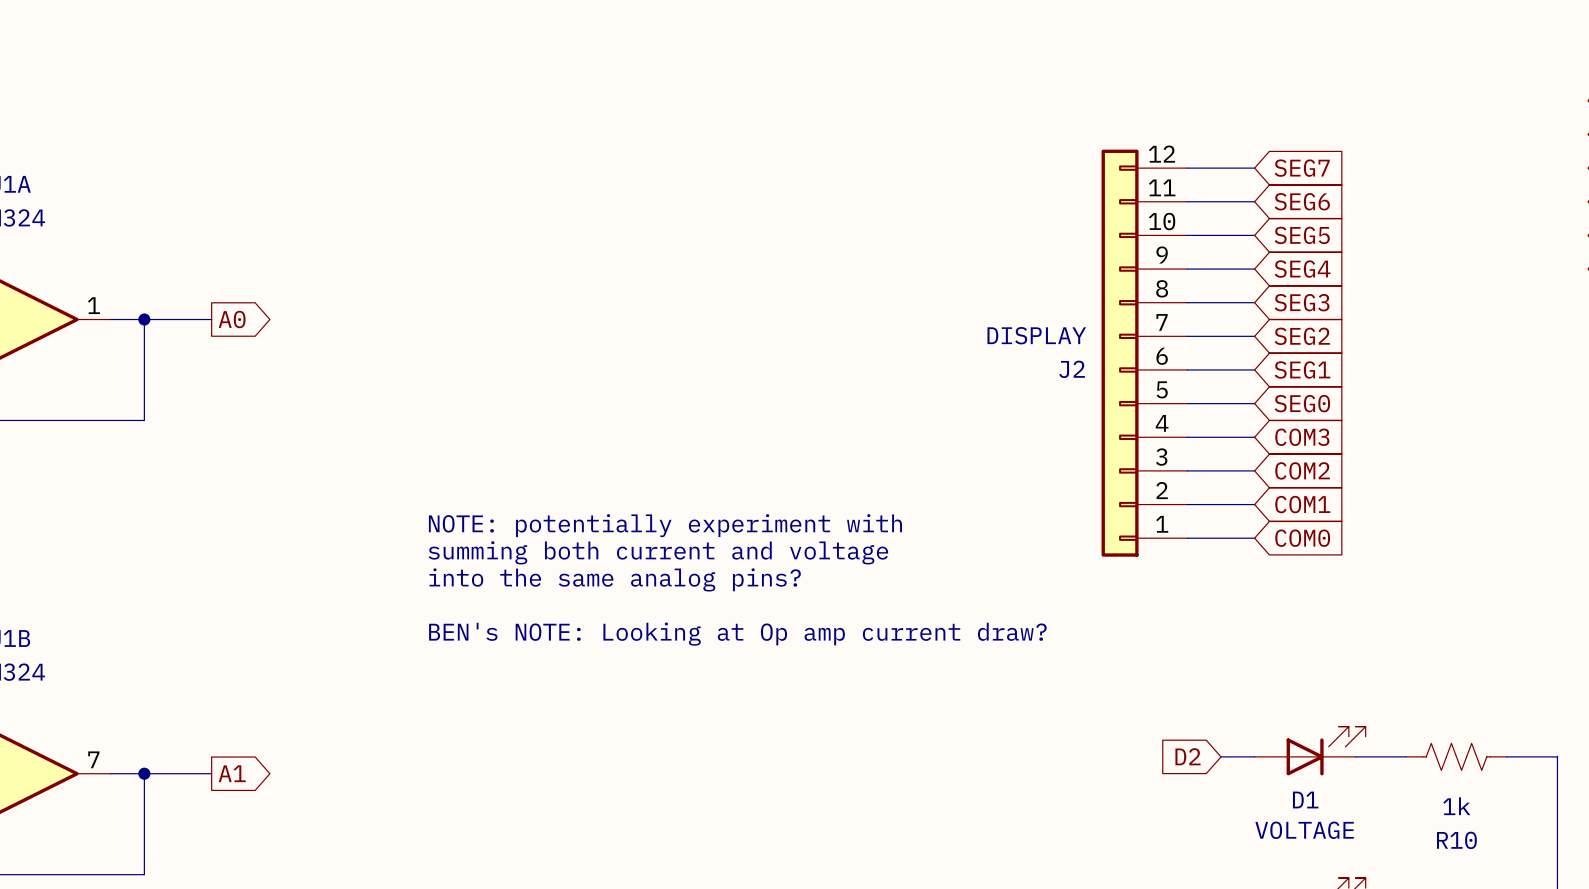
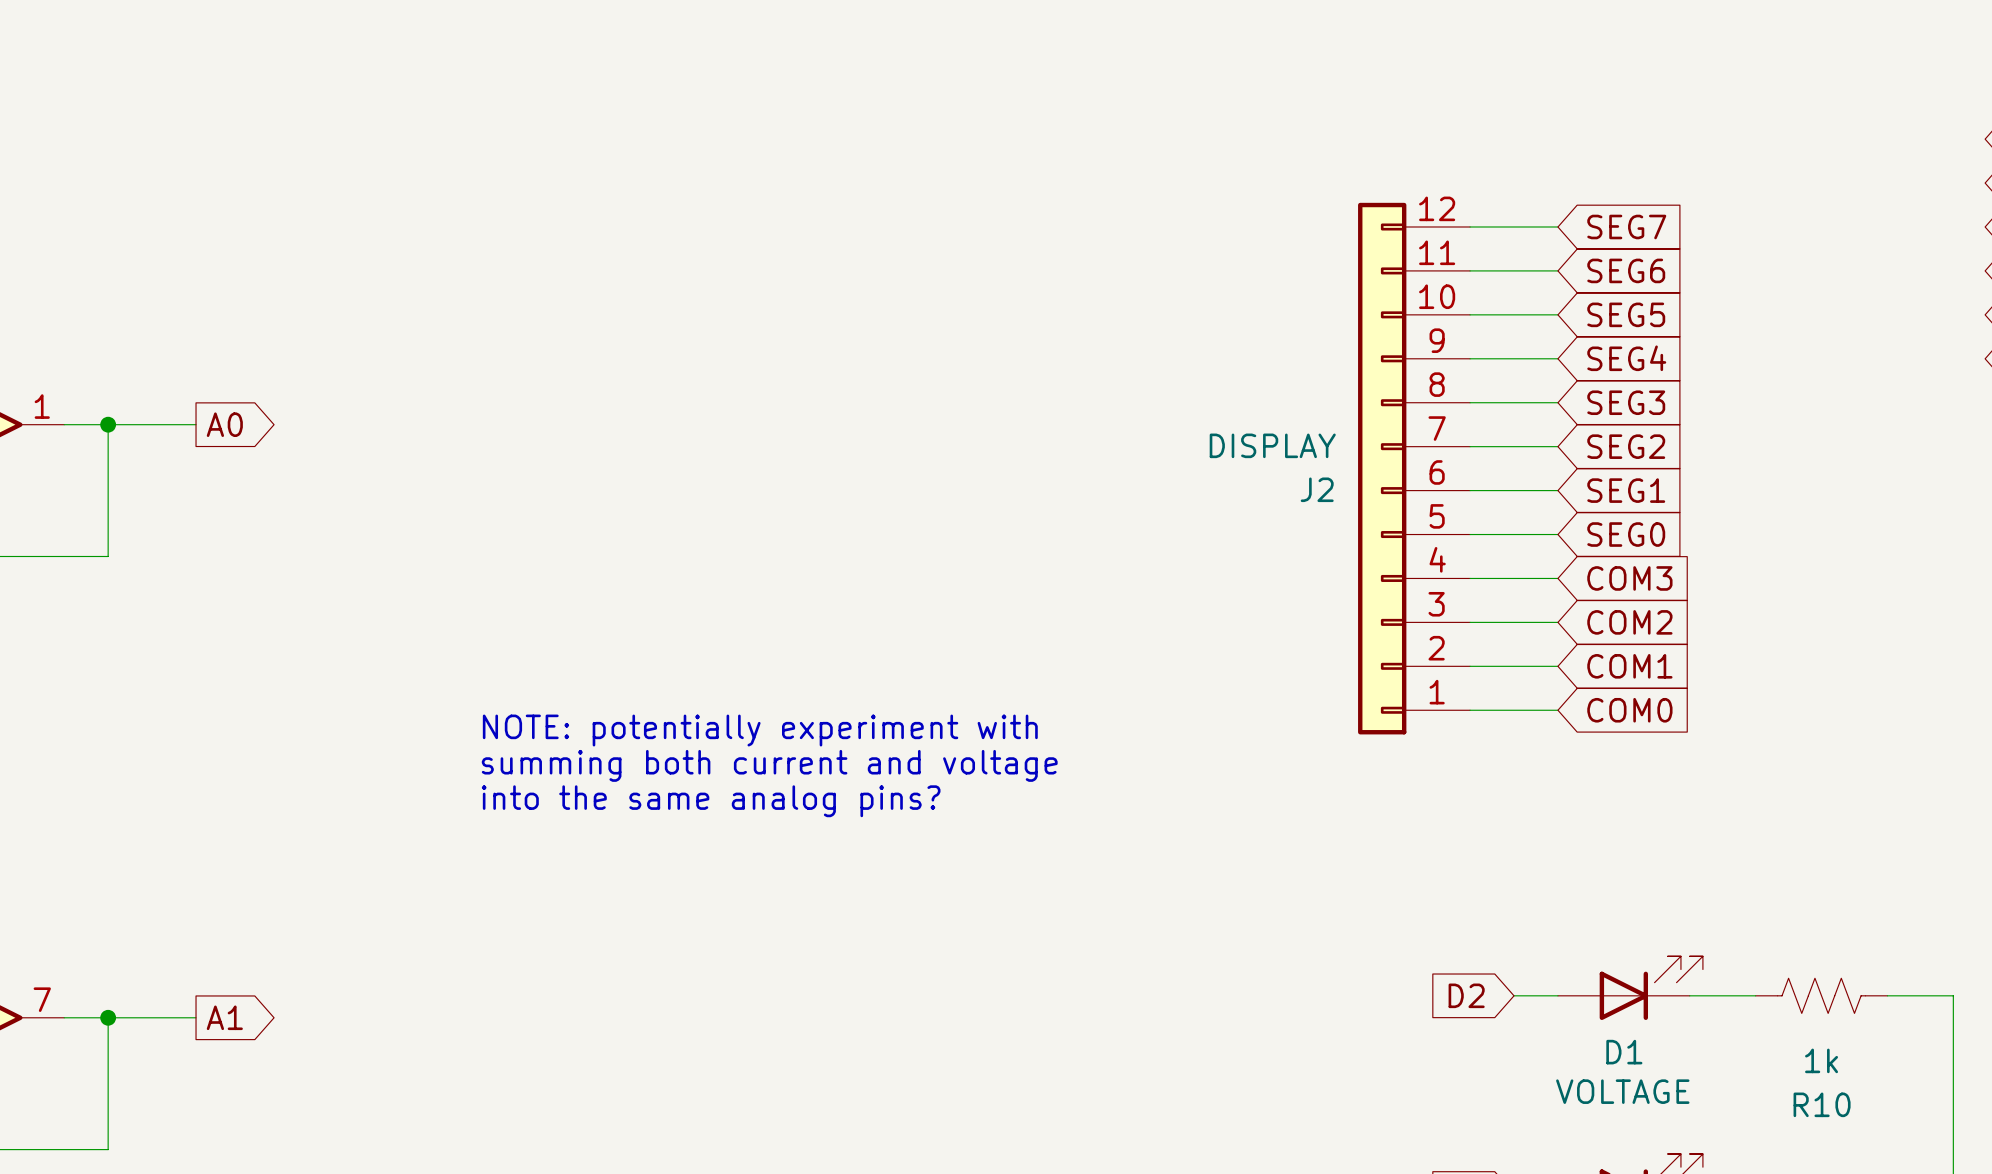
text: NOTE: potentially experiment with (665, 525) -> none
text: summing both current and voltage (658, 552) -> NOTE: potentially experiment with (760, 730)
text: into the same analog pins? (615, 579) -> summing both current and voltage (769, 765)
text: none -> into the same analog pins? (711, 801)
text: BEN's NOTE: Looking at Op amp current draw? (737, 634) -> none

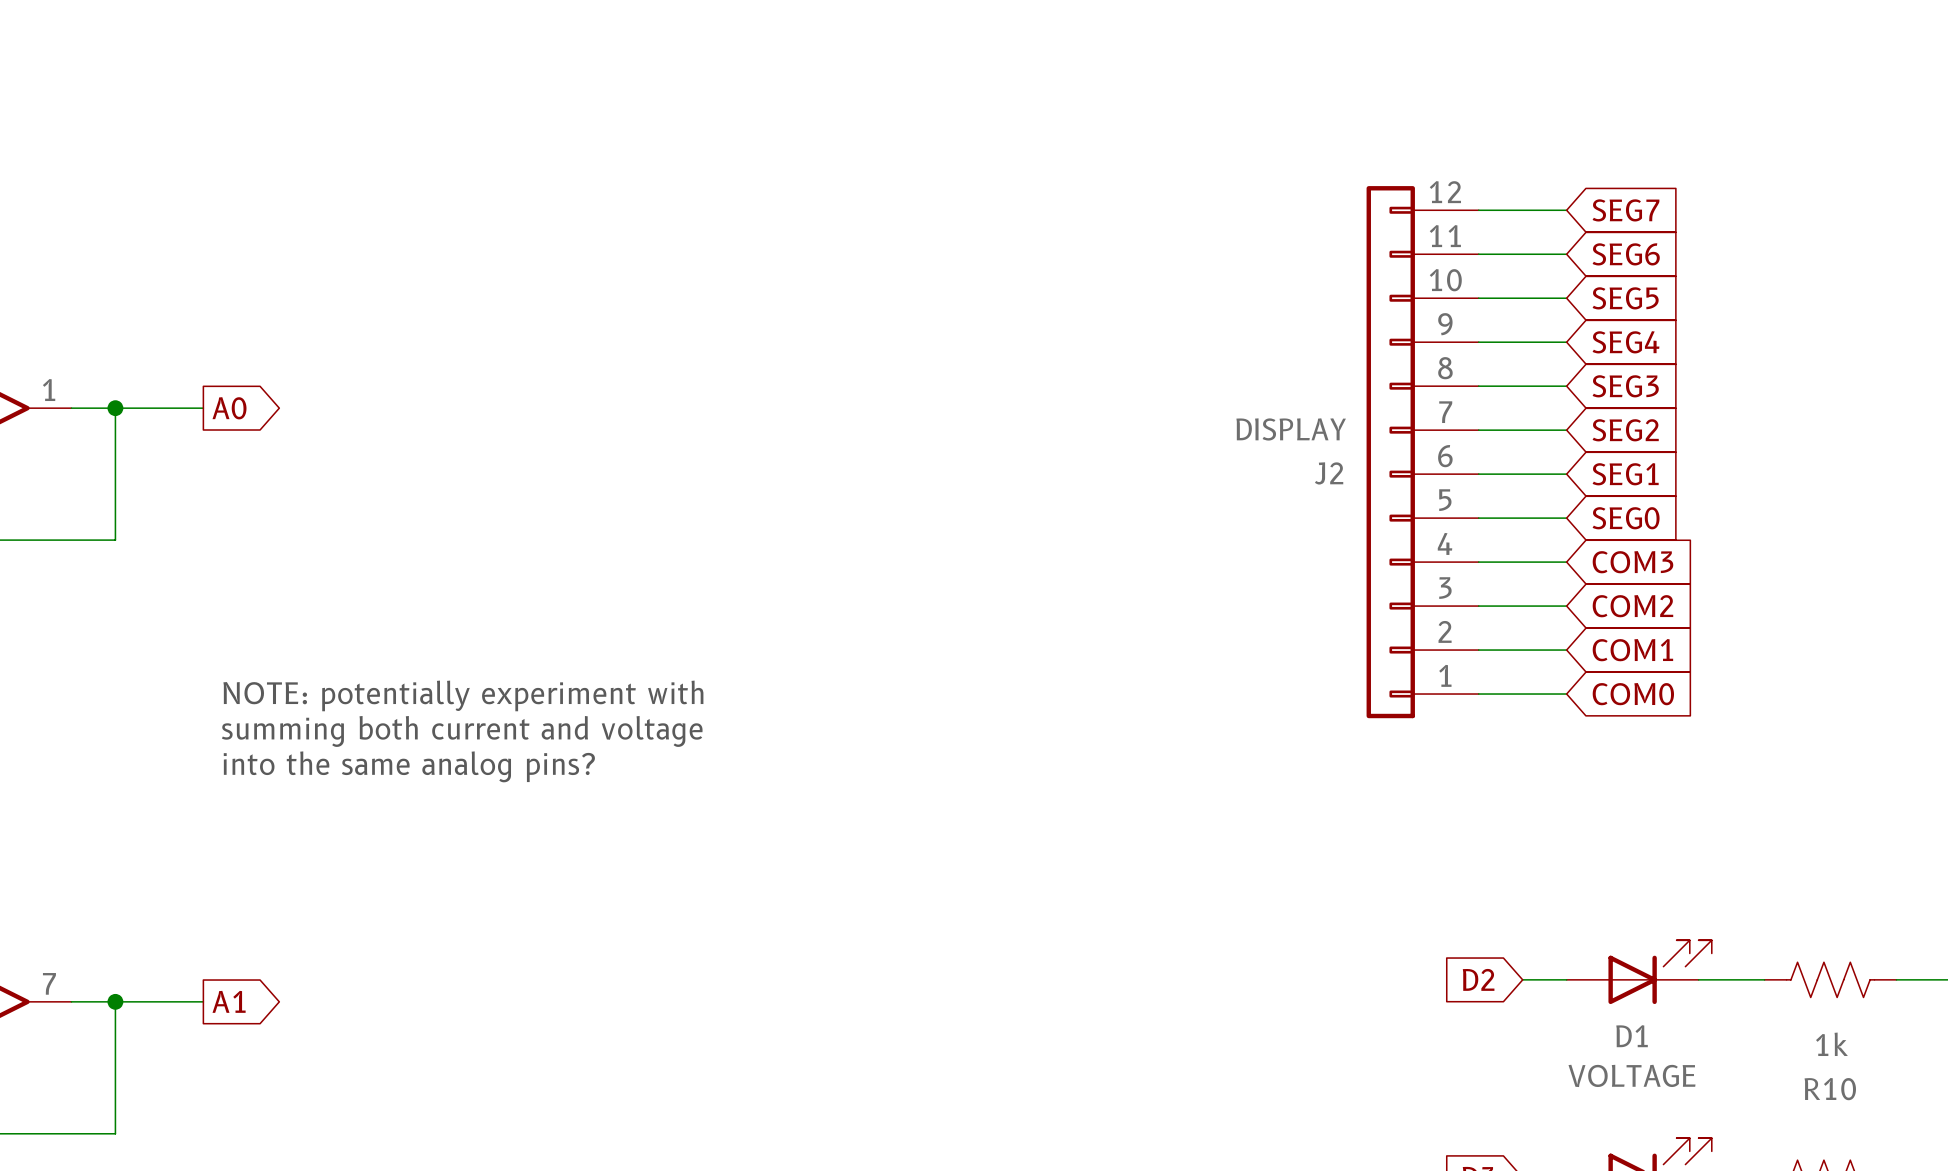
text position: NOTE: potentially experiment with (760, 730) -> NOTE: potentially experiment with (463, 695)
text position: summing both current and voltage (769, 765) -> summing both current and voltage (462, 731)
text position: into the same analog pins? (711, 801) -> into the same analog pins? (409, 766)

